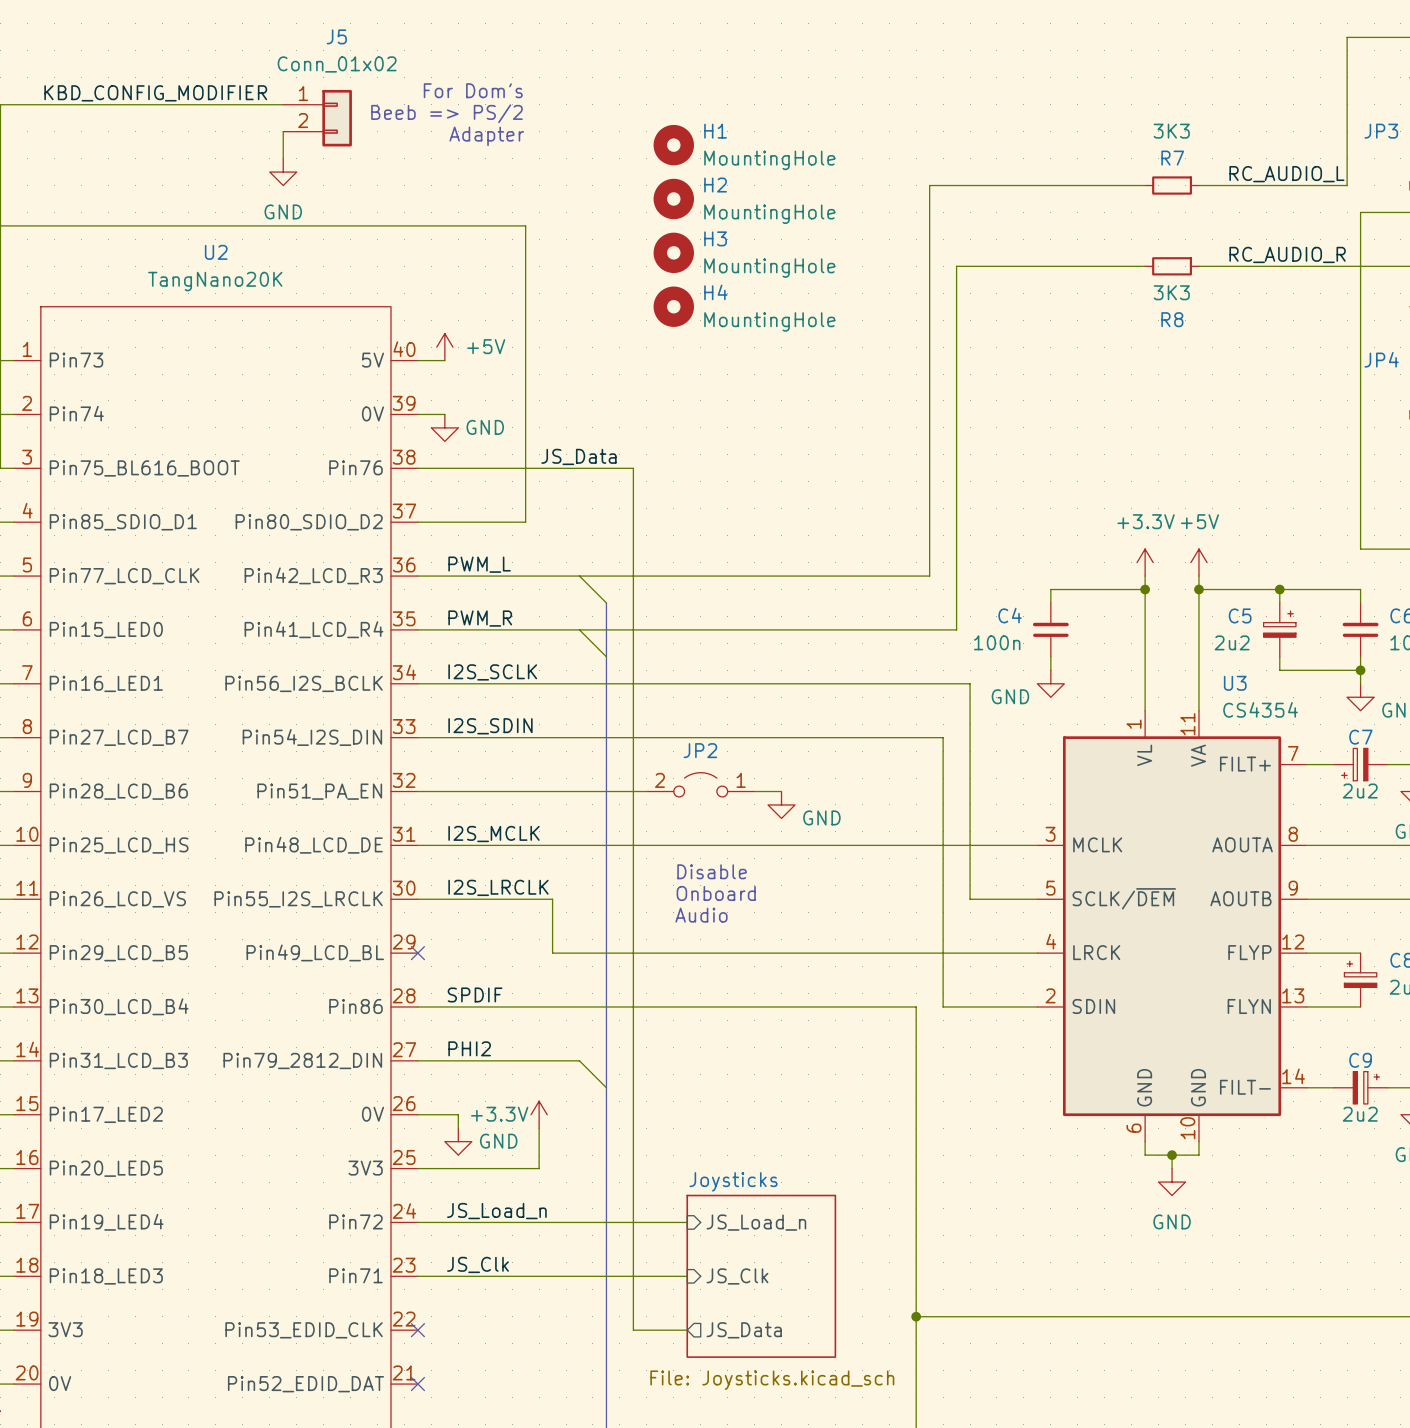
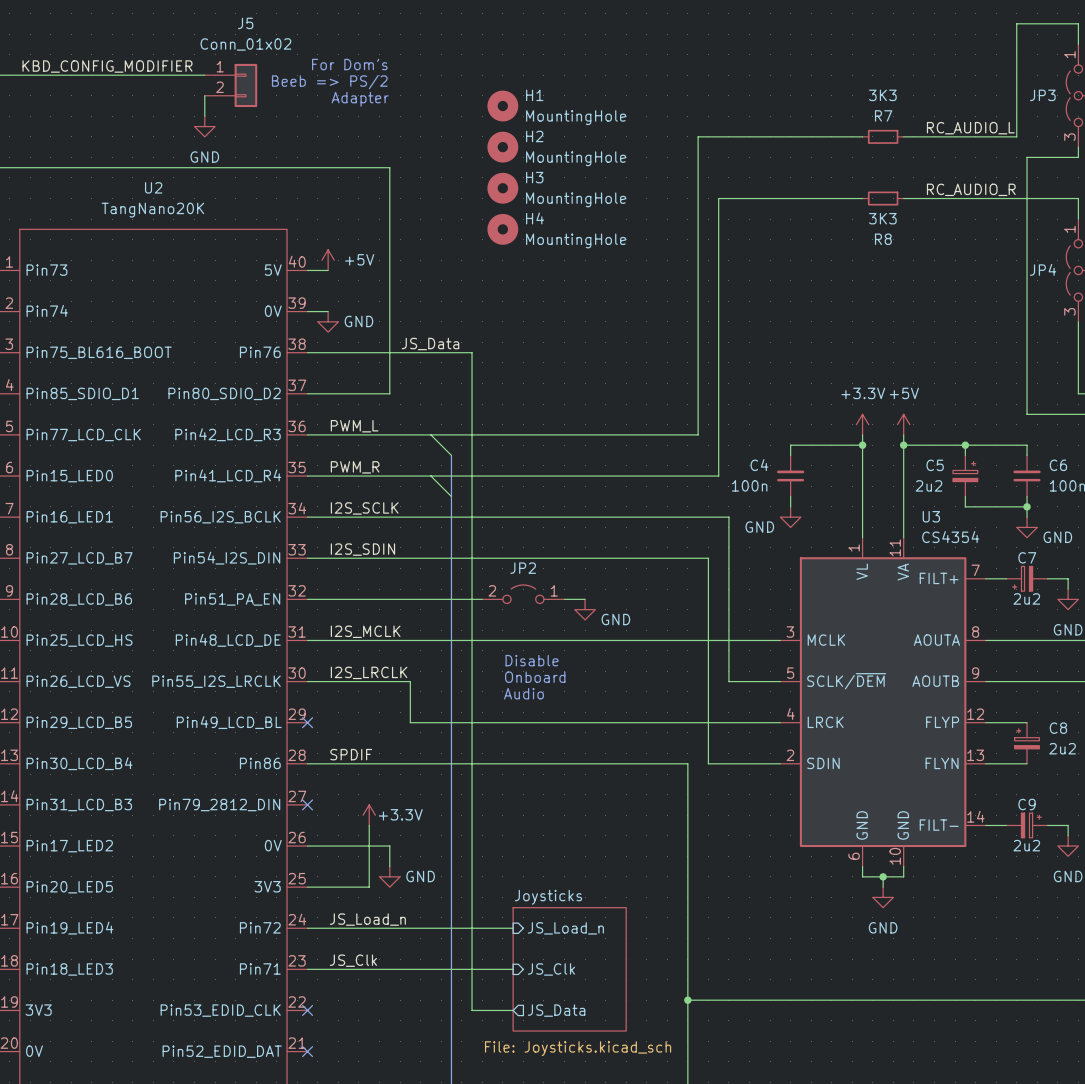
label: PHI2 (469, 1048) -> none
wire: (417, 1060) (579, 1060) (606, 1087) -> none
no-connect mark: none -> (307, 804)
wire: (458, 1114) (458, 1128) -> (338, 846) (389, 846) (389, 866)
power symbol text position: +3.3V (499, 1114) -> +3.3V (400, 814)
power symbol position: +3.3V (539, 1114) -> +3.3V (369, 815)
wire: (539, 1128) (539, 1168) (498, 1168) -> (369, 825) (369, 887)
power symbol position: GND (458, 1141) -> GND (389, 876)

